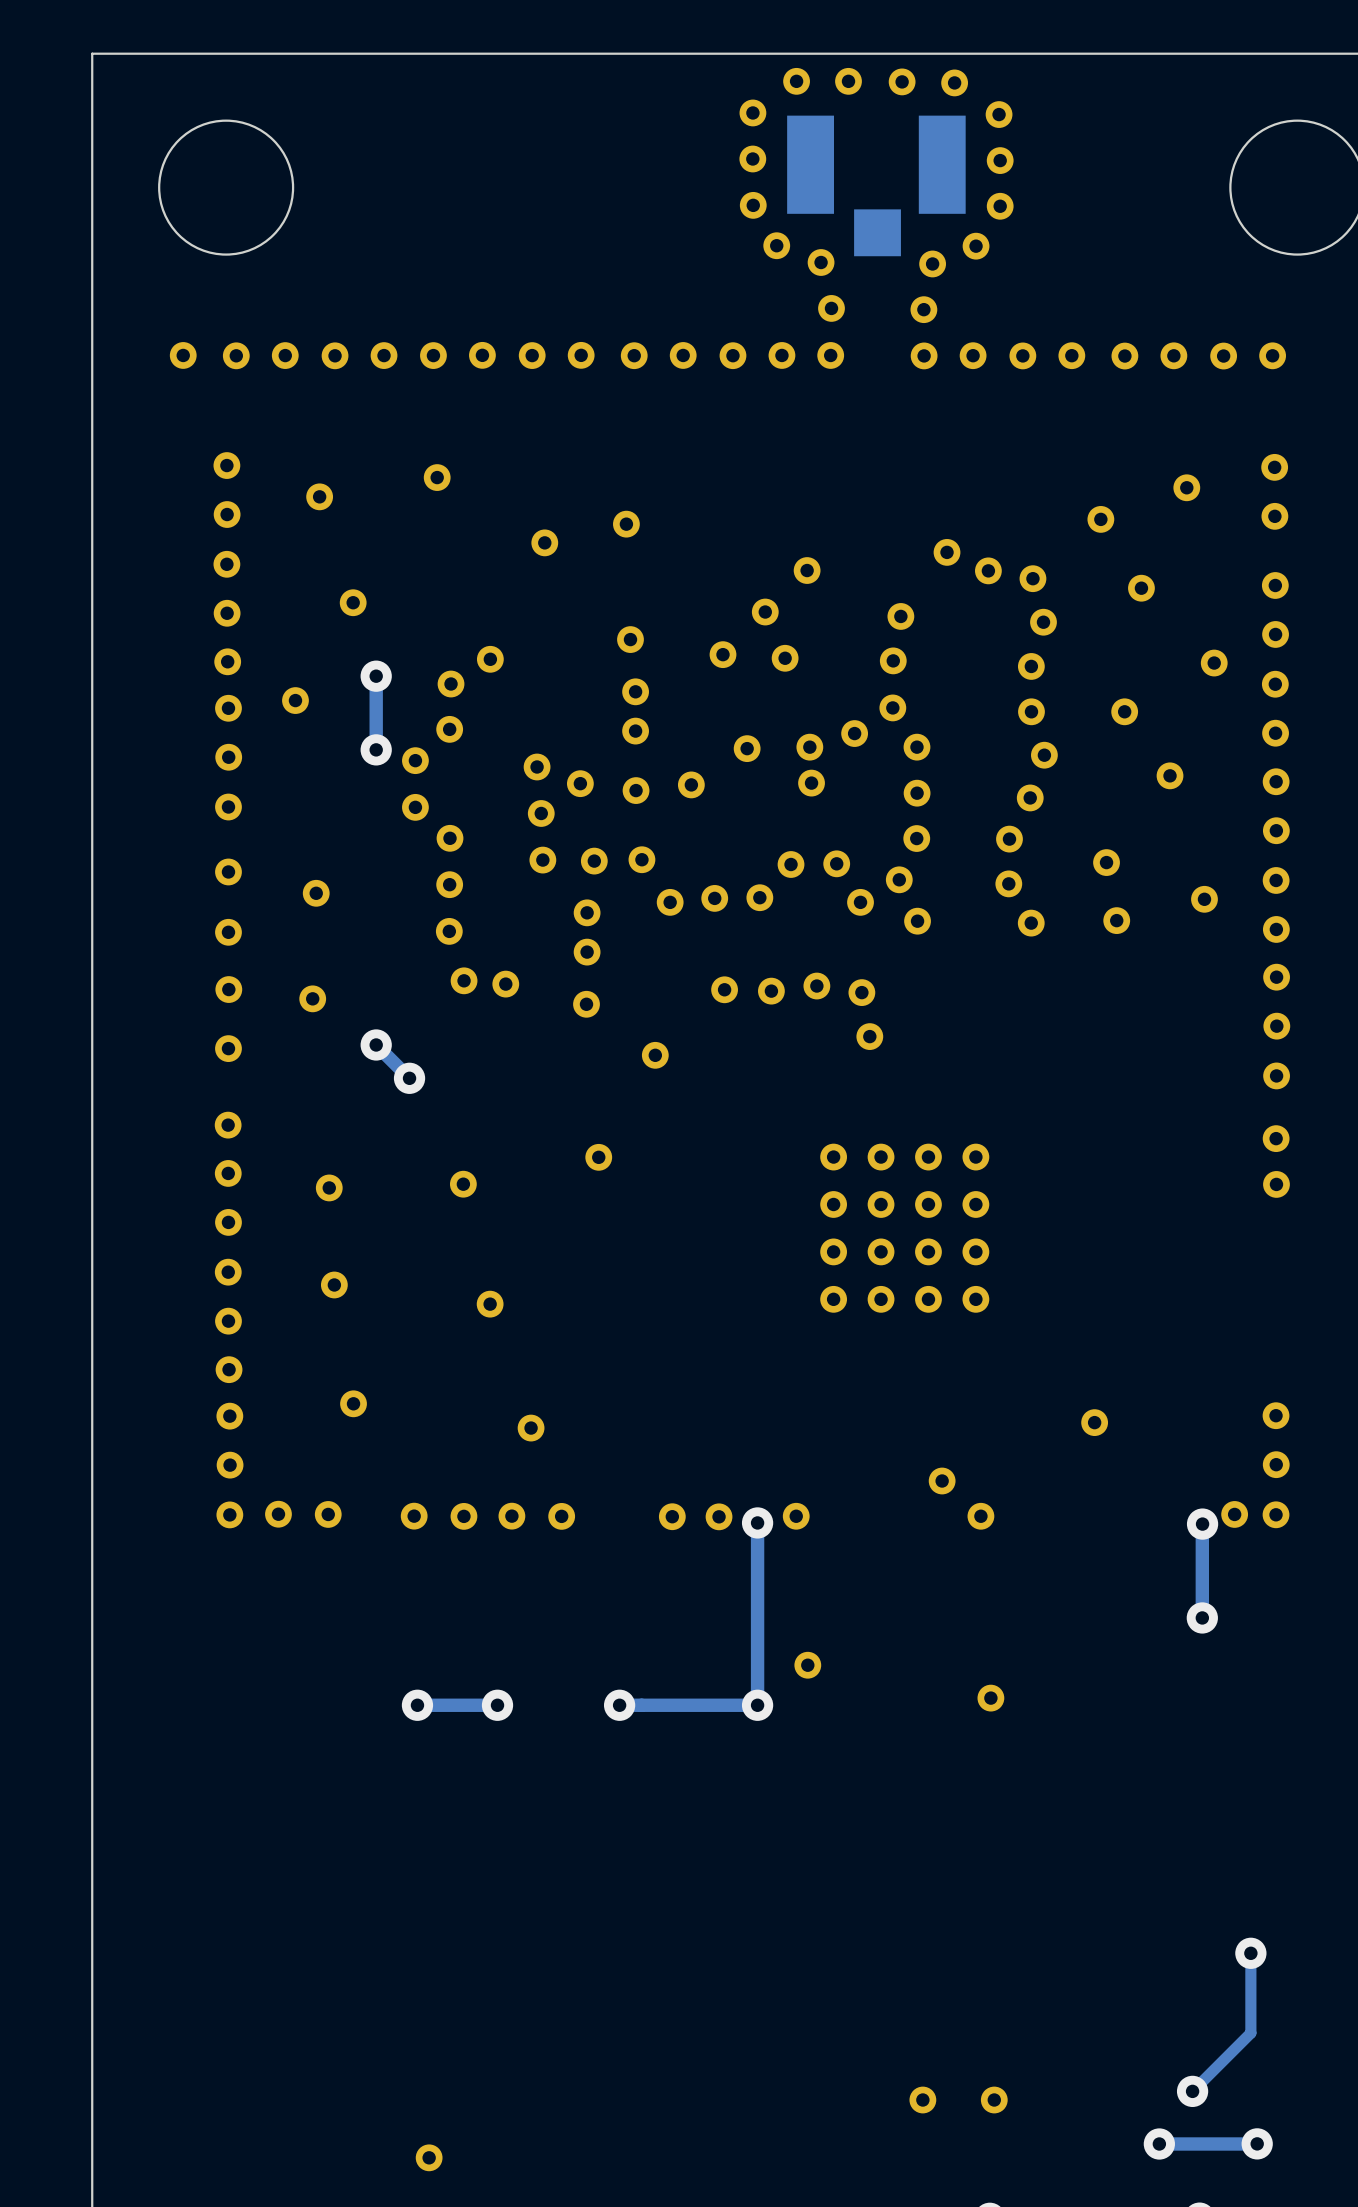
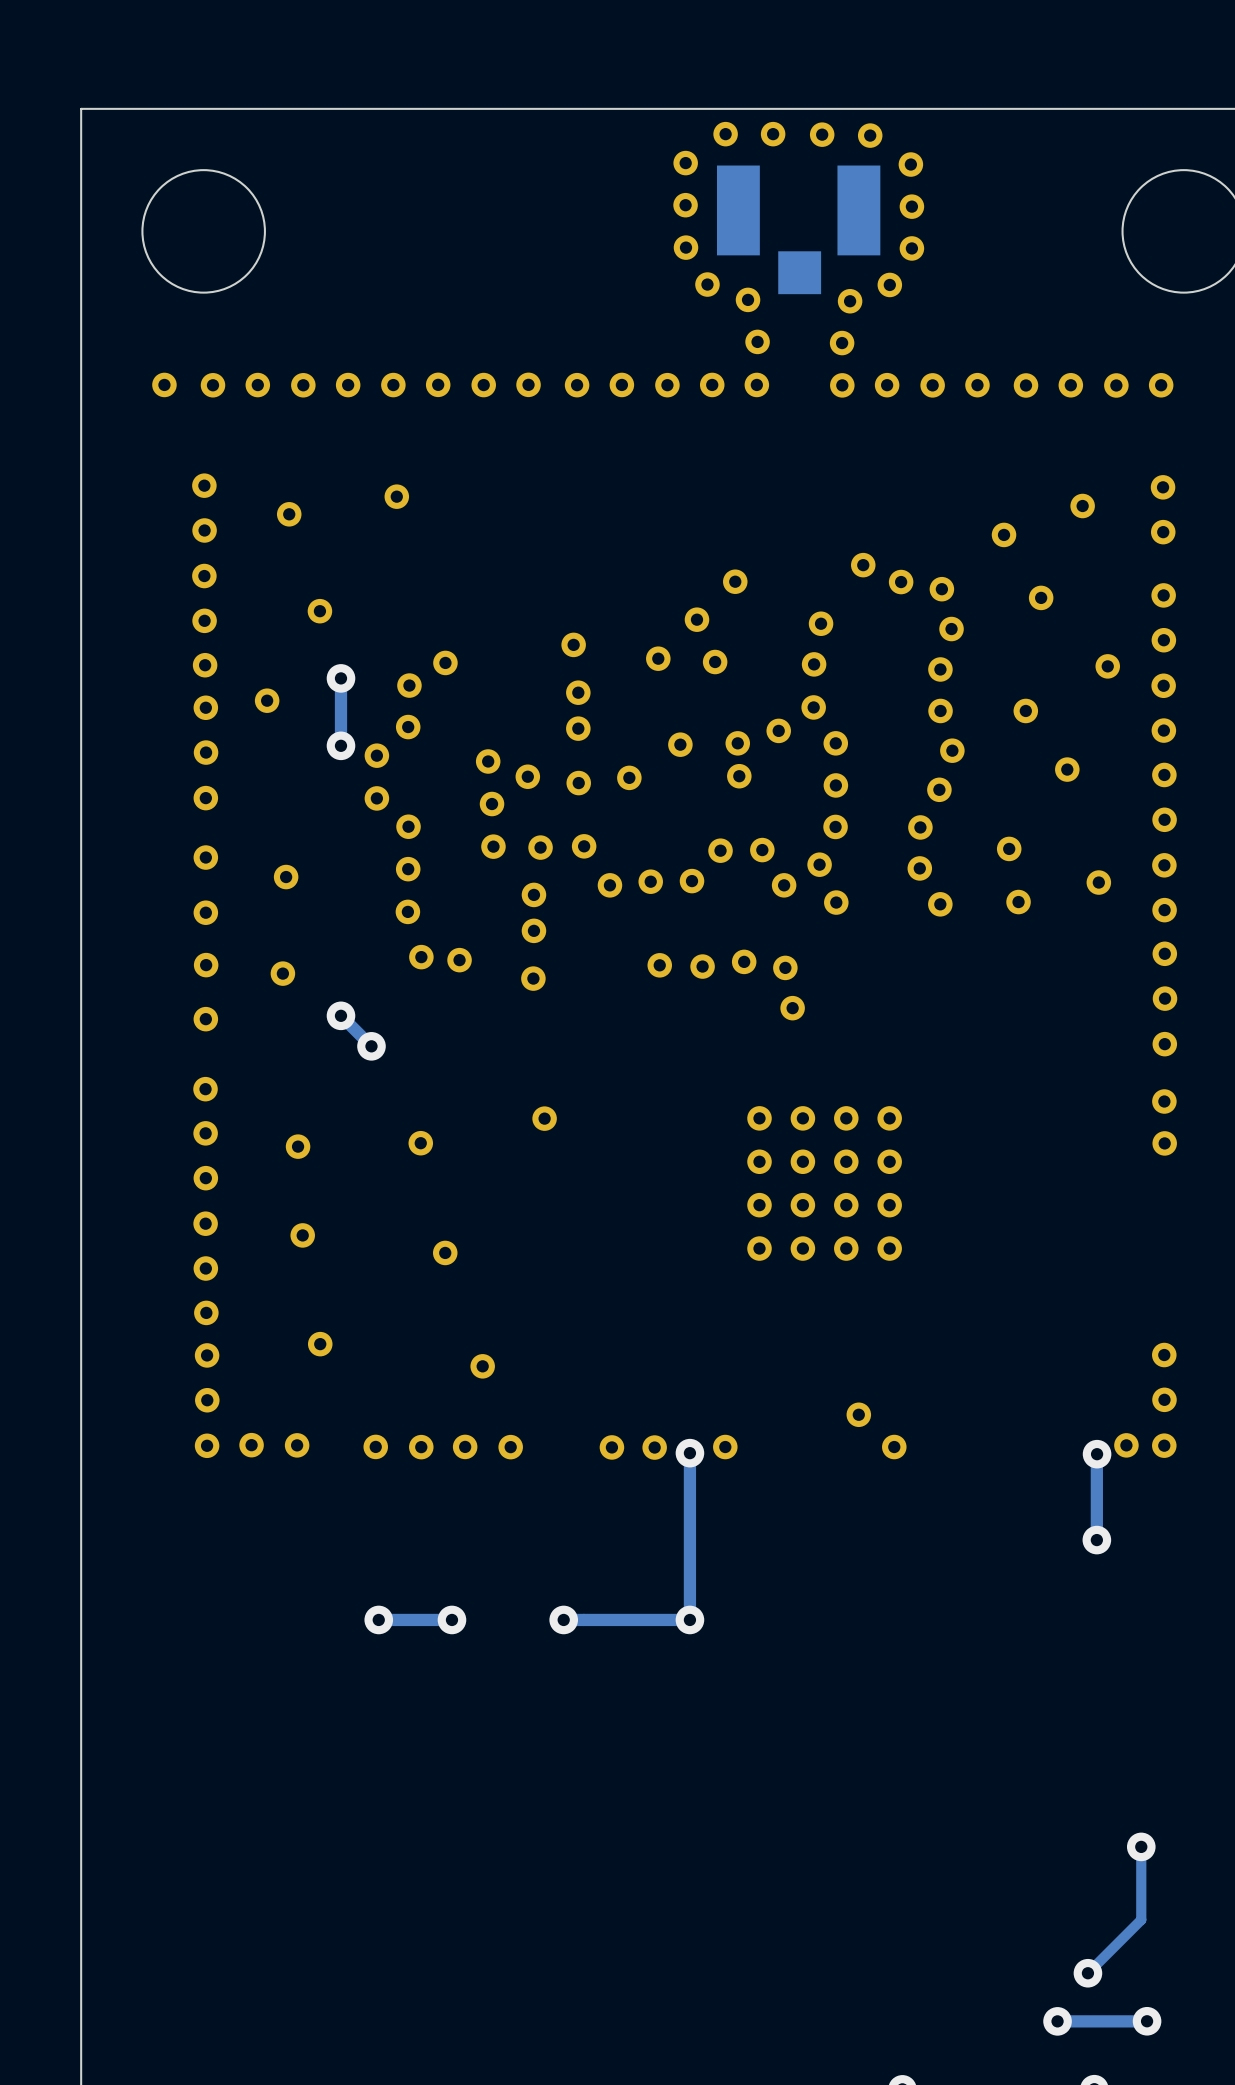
part: (626, 524) -> none
part: (544, 542) -> none
part: (655, 1055) -> none
part: (1094, 1422) -> none
part: (807, 1665) -> none
part: (990, 1698) -> none
part: (922, 2100) -> none
part: (994, 2100) -> none
part: (429, 2157) -> none

